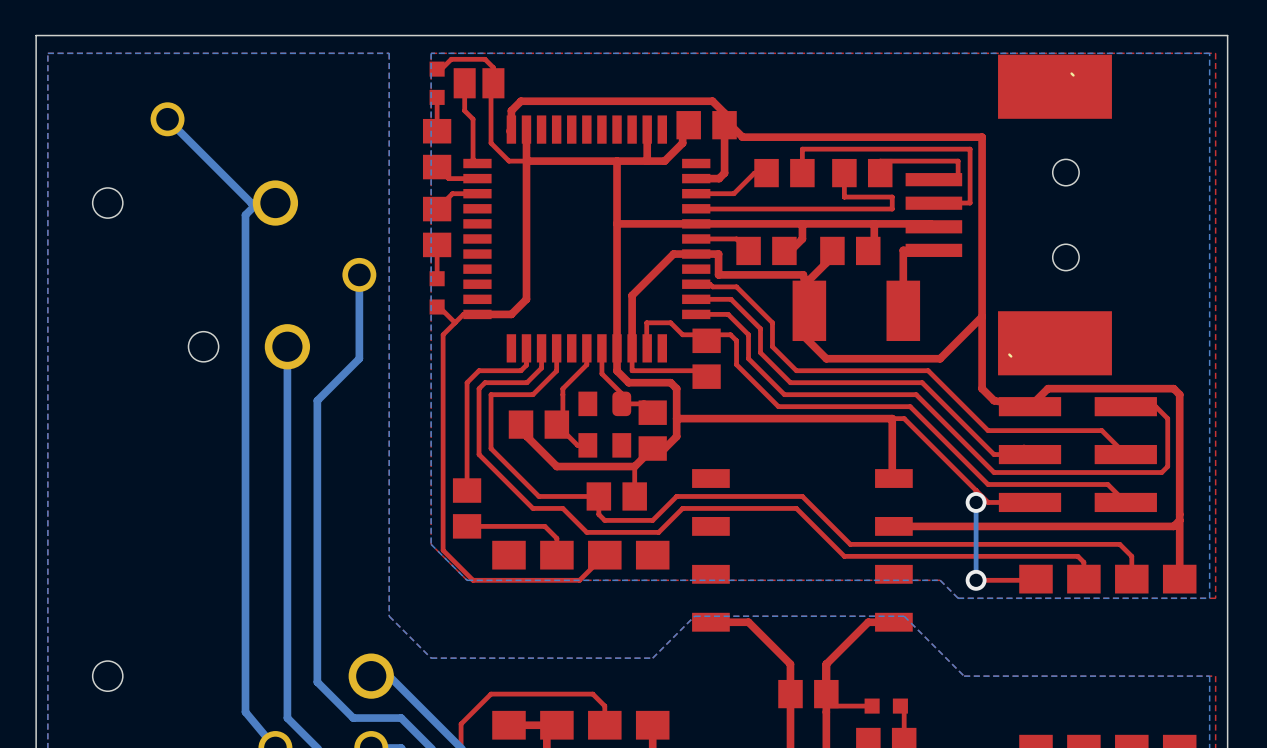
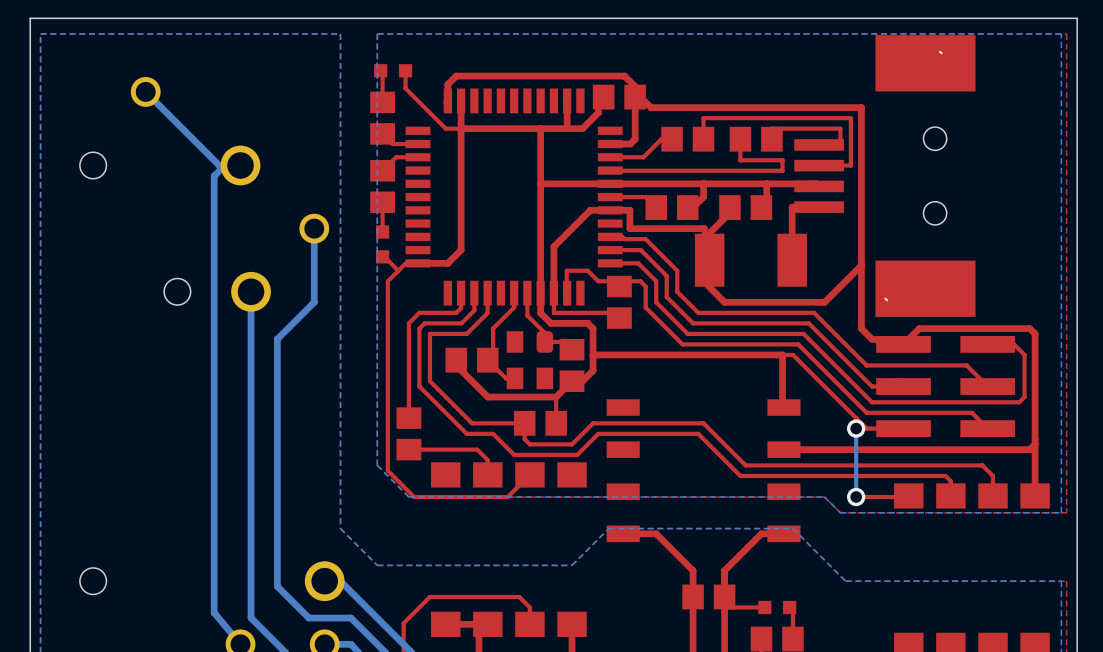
top track: (437, 69) (439, 71) (451, 59) (485, 59) (493, 67) (493, 83) (491, 85) (491, 143) -> (405, 70) (405, 88) (429, 112)
part rotation: 0° (437, 83) -> 90° clockwise (393, 70)
top track: (464, 83) (464, 110) (473, 119) (473, 159) (477, 163) -> none
part: (479, 83) -> none

